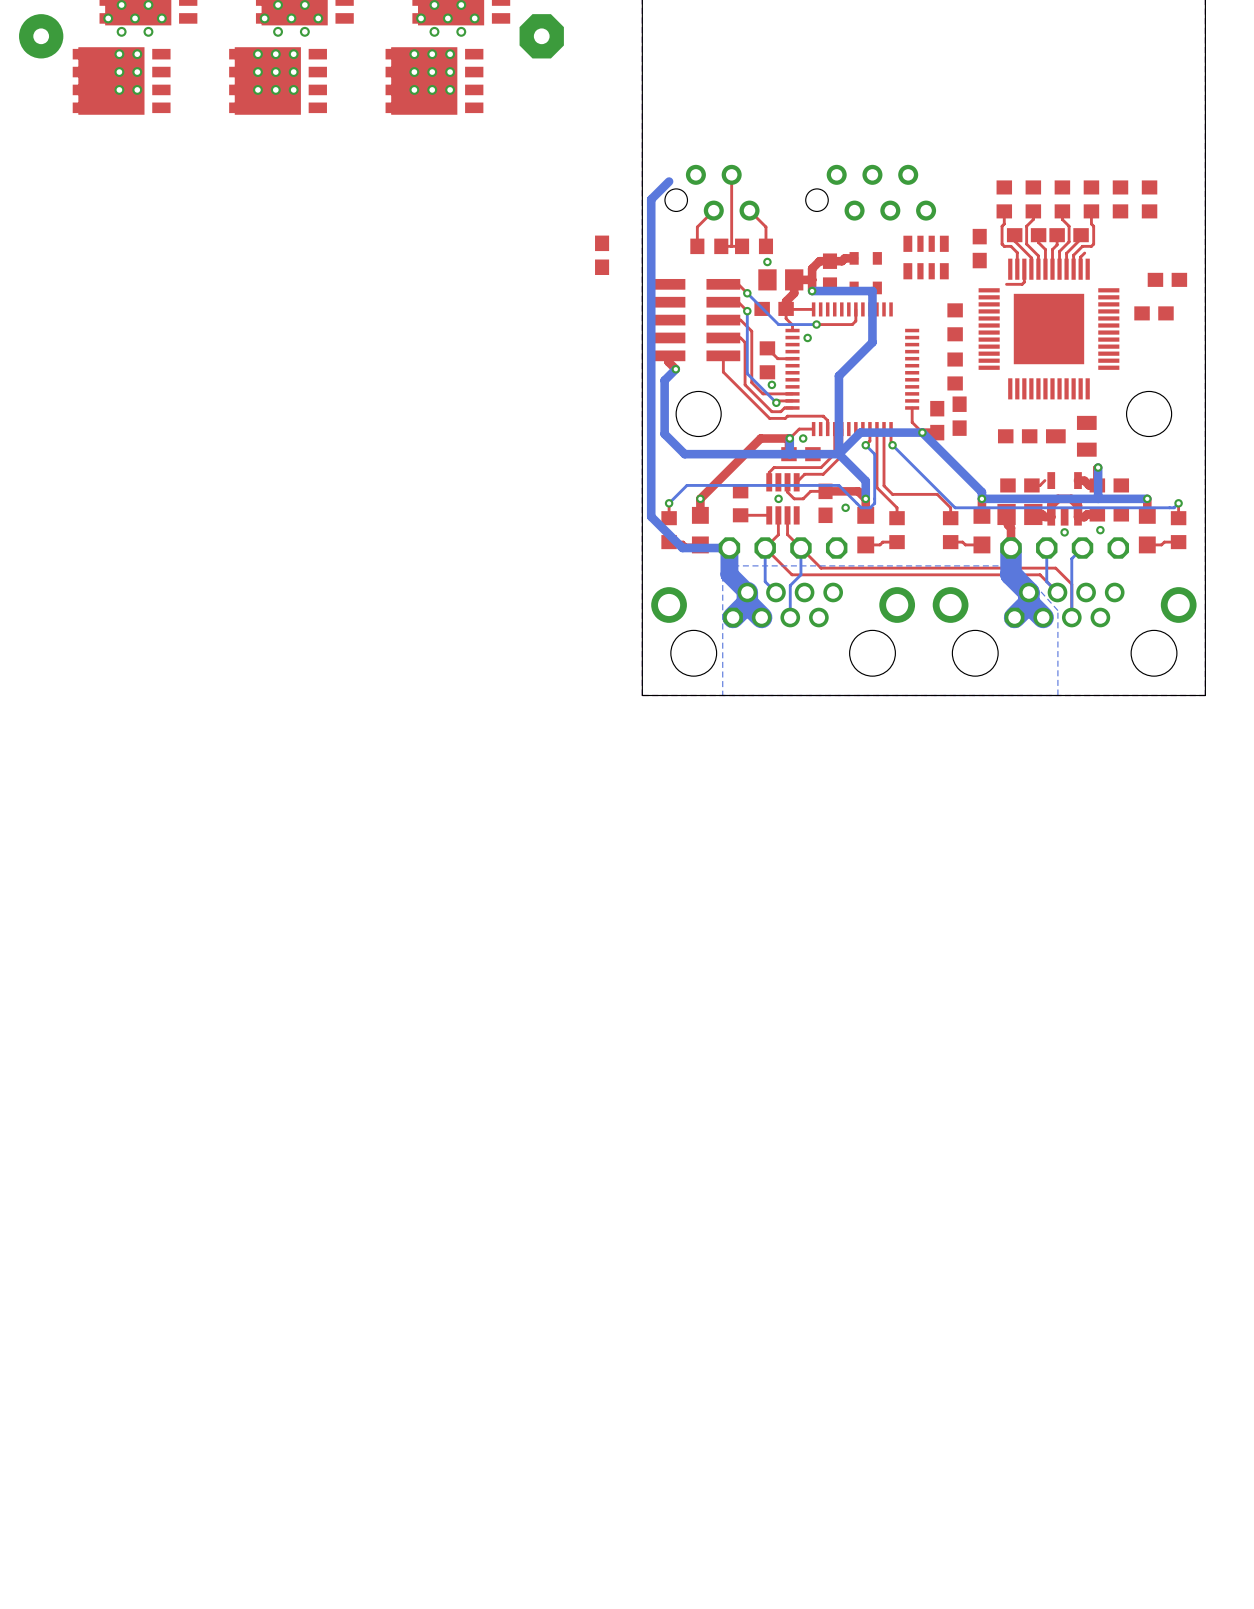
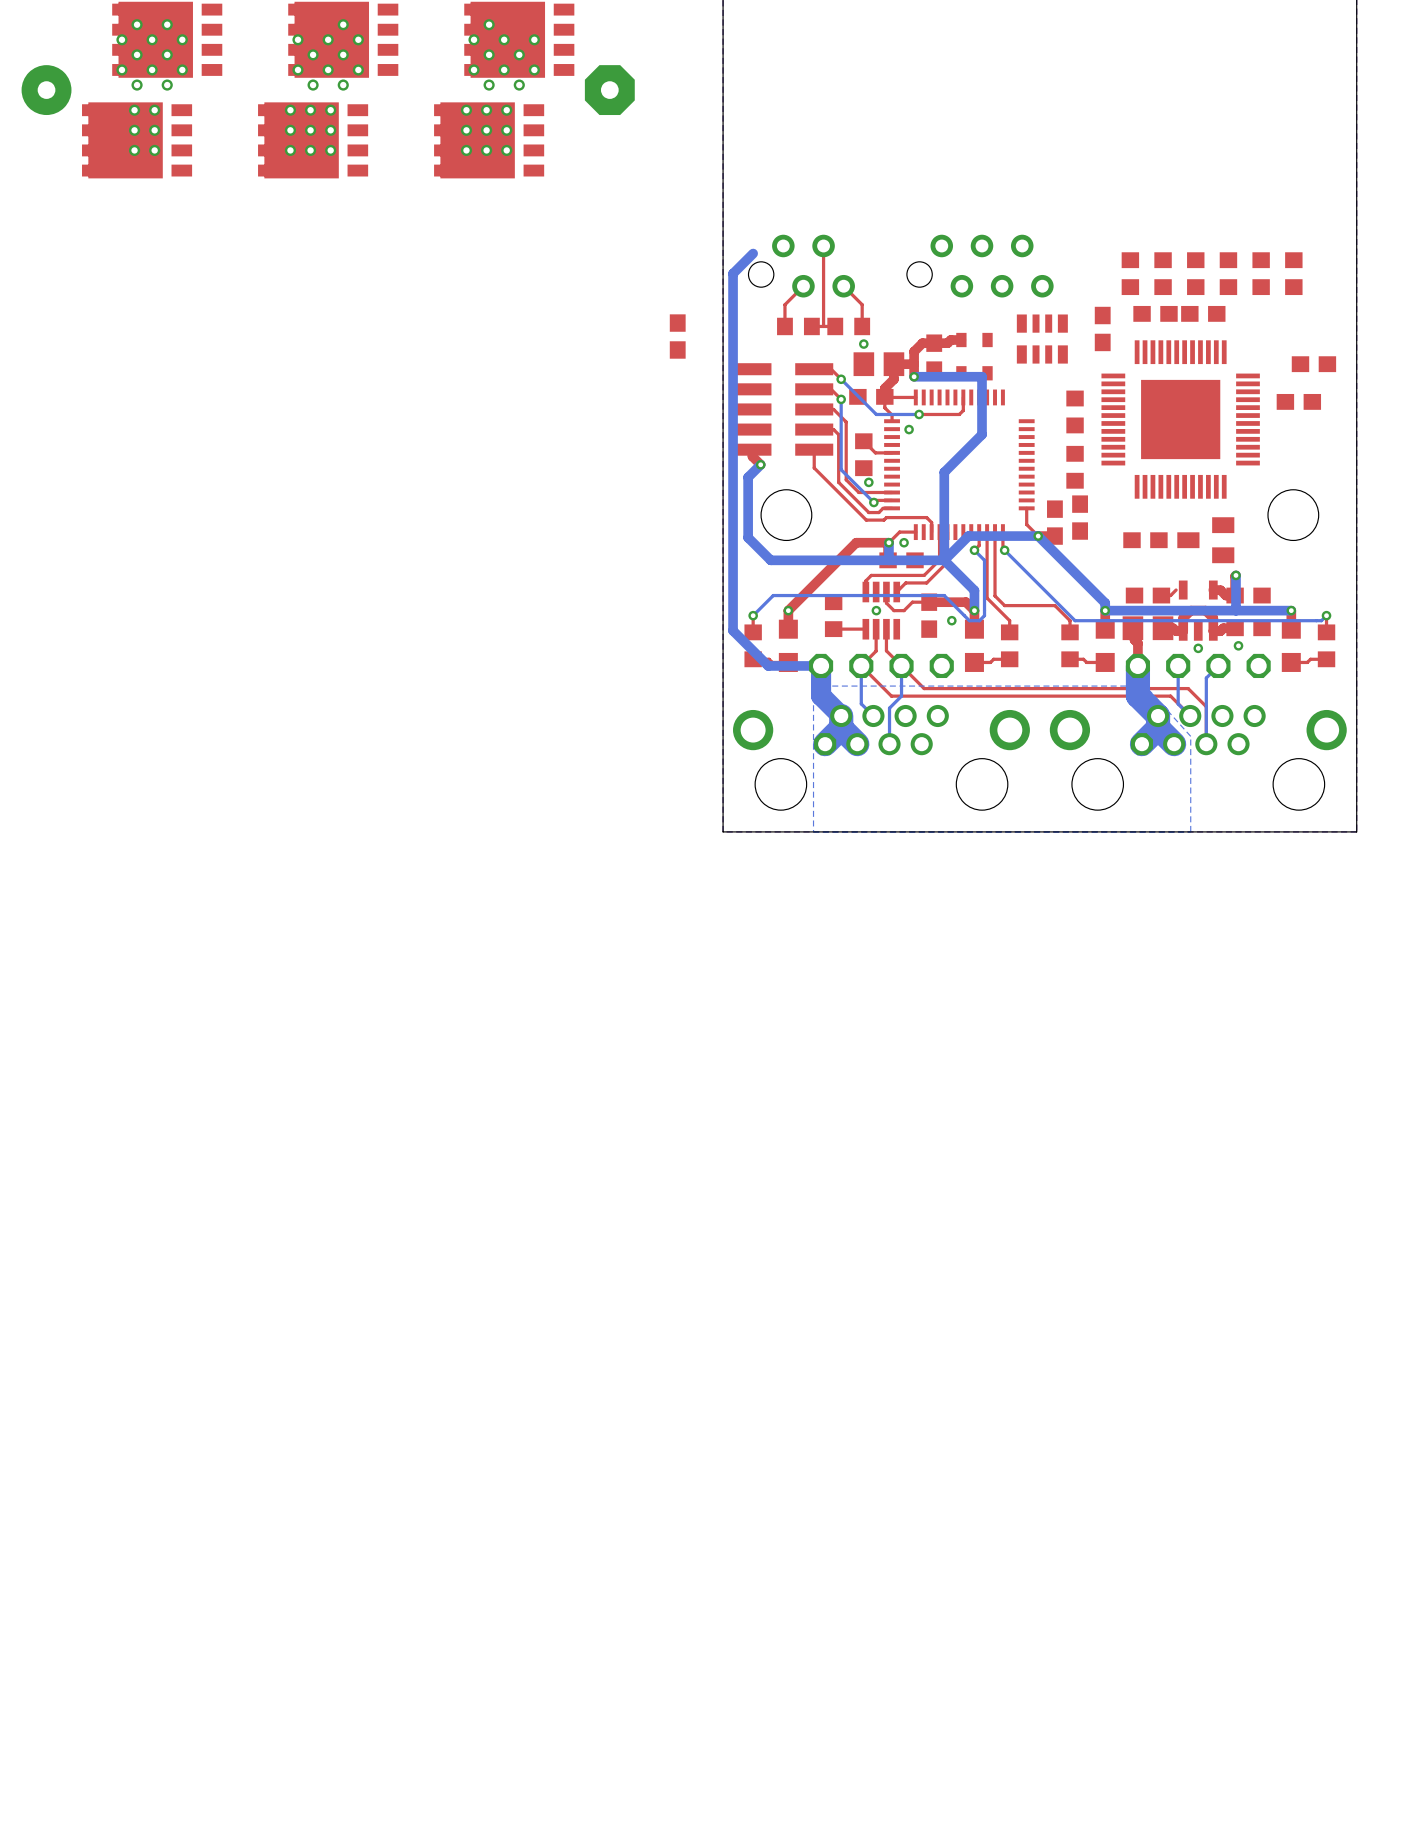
top track: (1004, 211) (1002, 244) (1004, 246) (1010, 246) (1017, 252) (1017, 269) -> none
top track: (1033, 211) (1033, 219) (1026, 226) (1026, 244) (1038, 255) (1038, 269) -> none
top track: (1062, 211) (1062, 219) (1069, 226) (1069, 241) (1059, 251) (1059, 269) -> none
top track: (1091, 211) (1093, 244) (1091, 246) (1082, 246) (1073, 255) (1073, 269) -> none
top track: (1014, 235) (1014, 241) (1031, 257) (1031, 269) -> none
top track: (1038, 235) (1038, 242) (1045, 249) (1045, 269) -> none
top track: (1057, 235) (1057, 244) (1052, 249) (1052, 269) -> none
top track: (1081, 235) (1081, 238) (1066, 253) (1066, 269) -> none
top track: (1084, 253) (1080, 257) (1080, 269) -> none
top track: (1024, 269) (1024, 282) (1022, 284) (1006, 284) -> none

